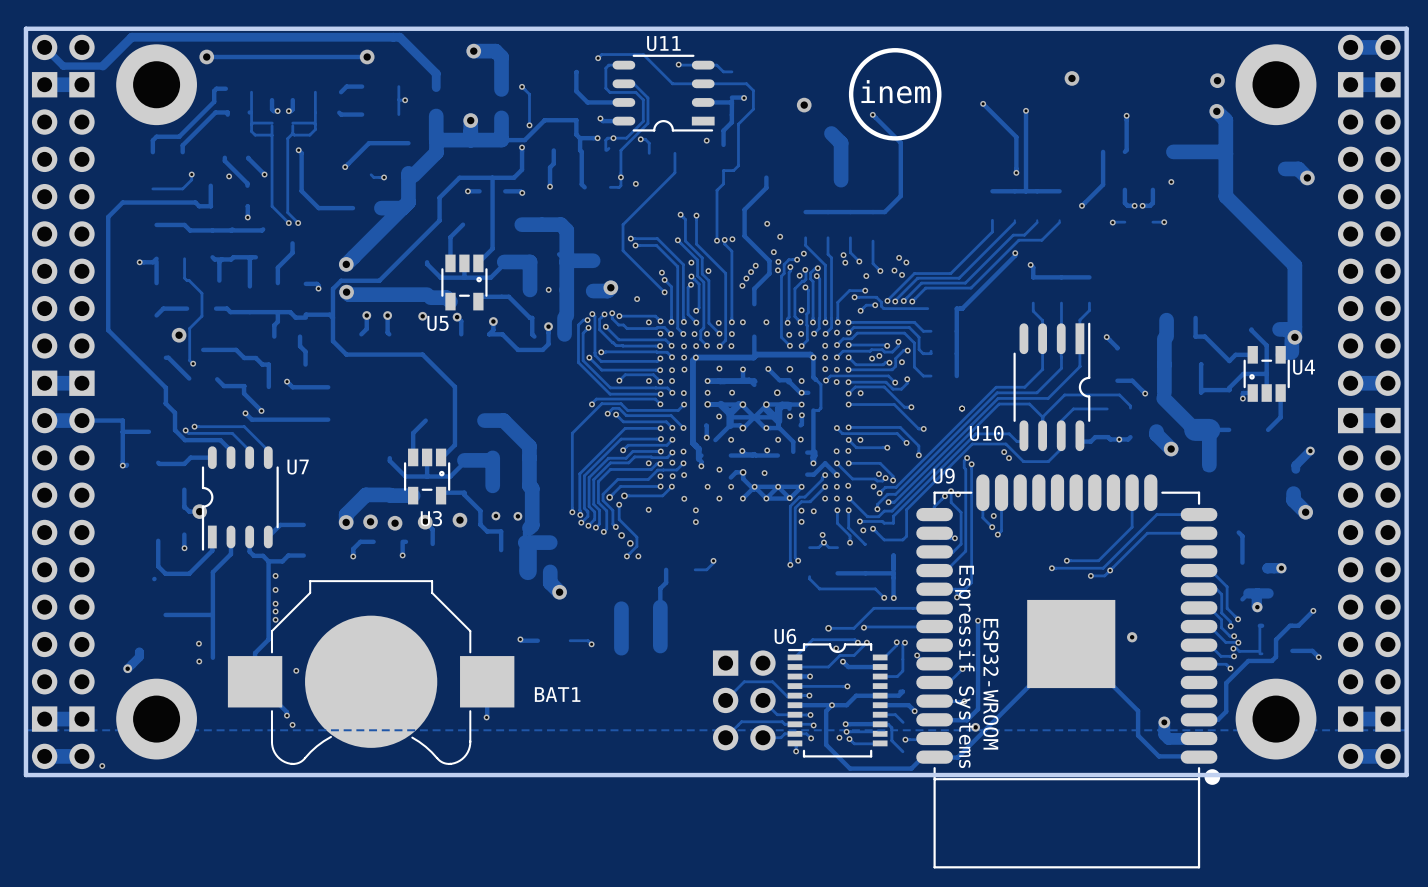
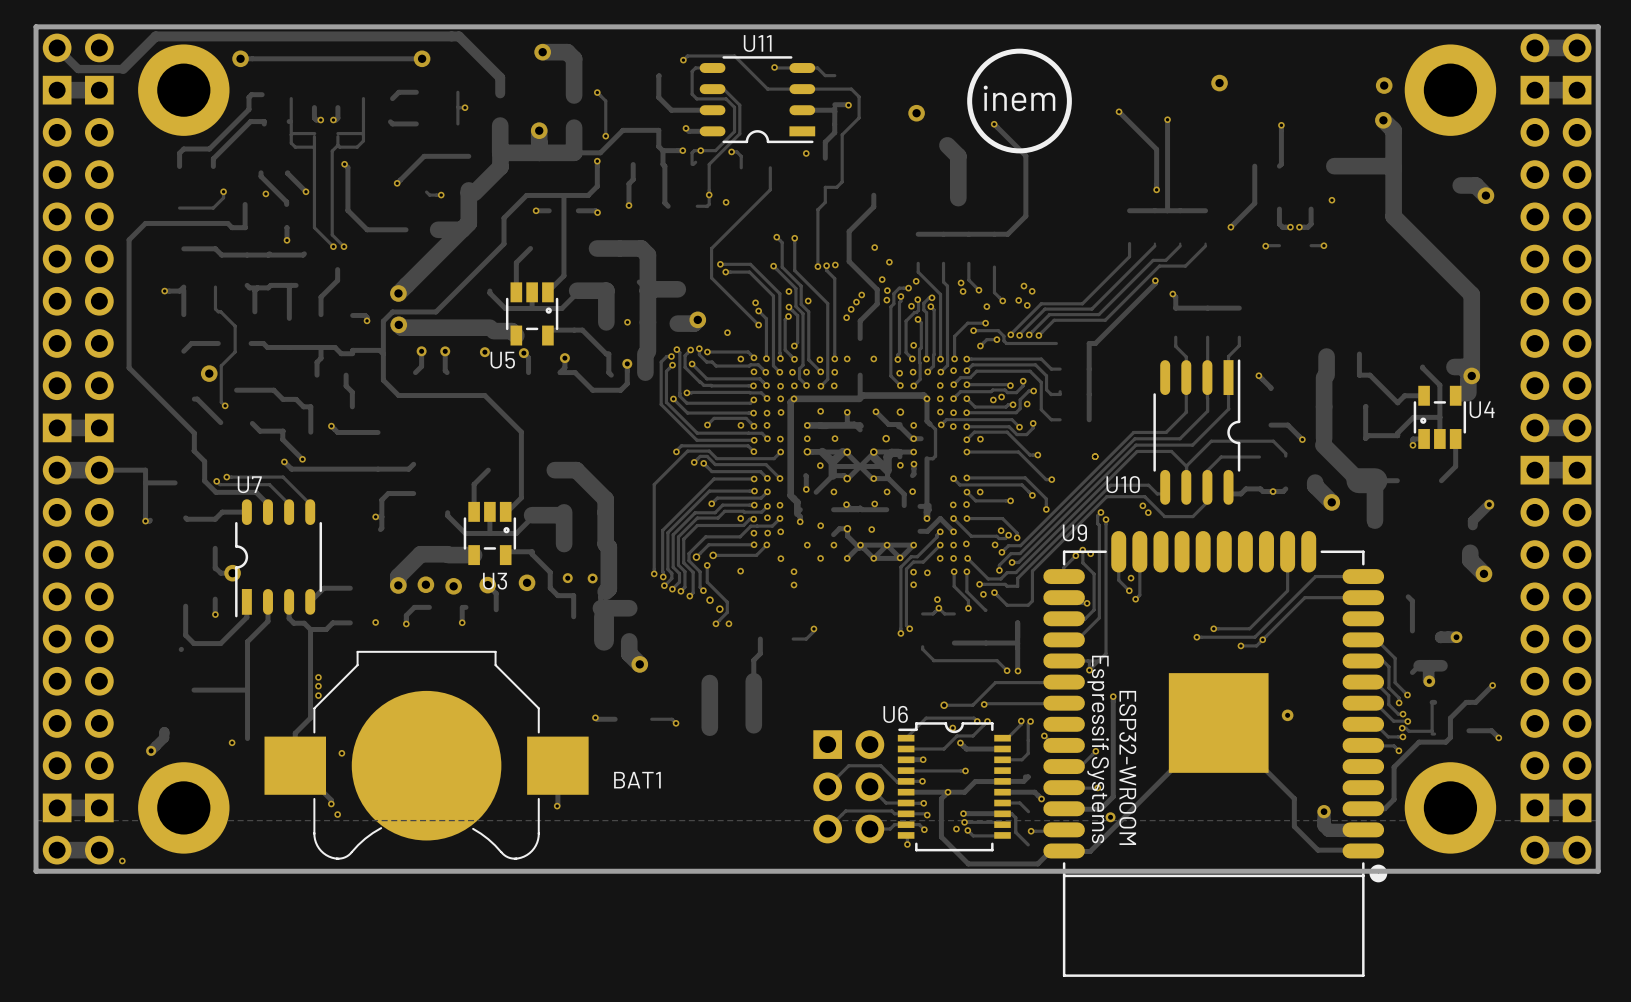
track: none -> (413, 464) (408, 469) (378, 469)
track: none -> (413, 493) (388, 493) (381, 500) (380, 529)
via: none -> (375, 516)
U7 name position: U7 (298, 467) -> U7 (249, 484)
via: none -> (375, 622)
via: (275, 575) -> none
via: (275, 589) -> none
via: (198, 643) -> none

